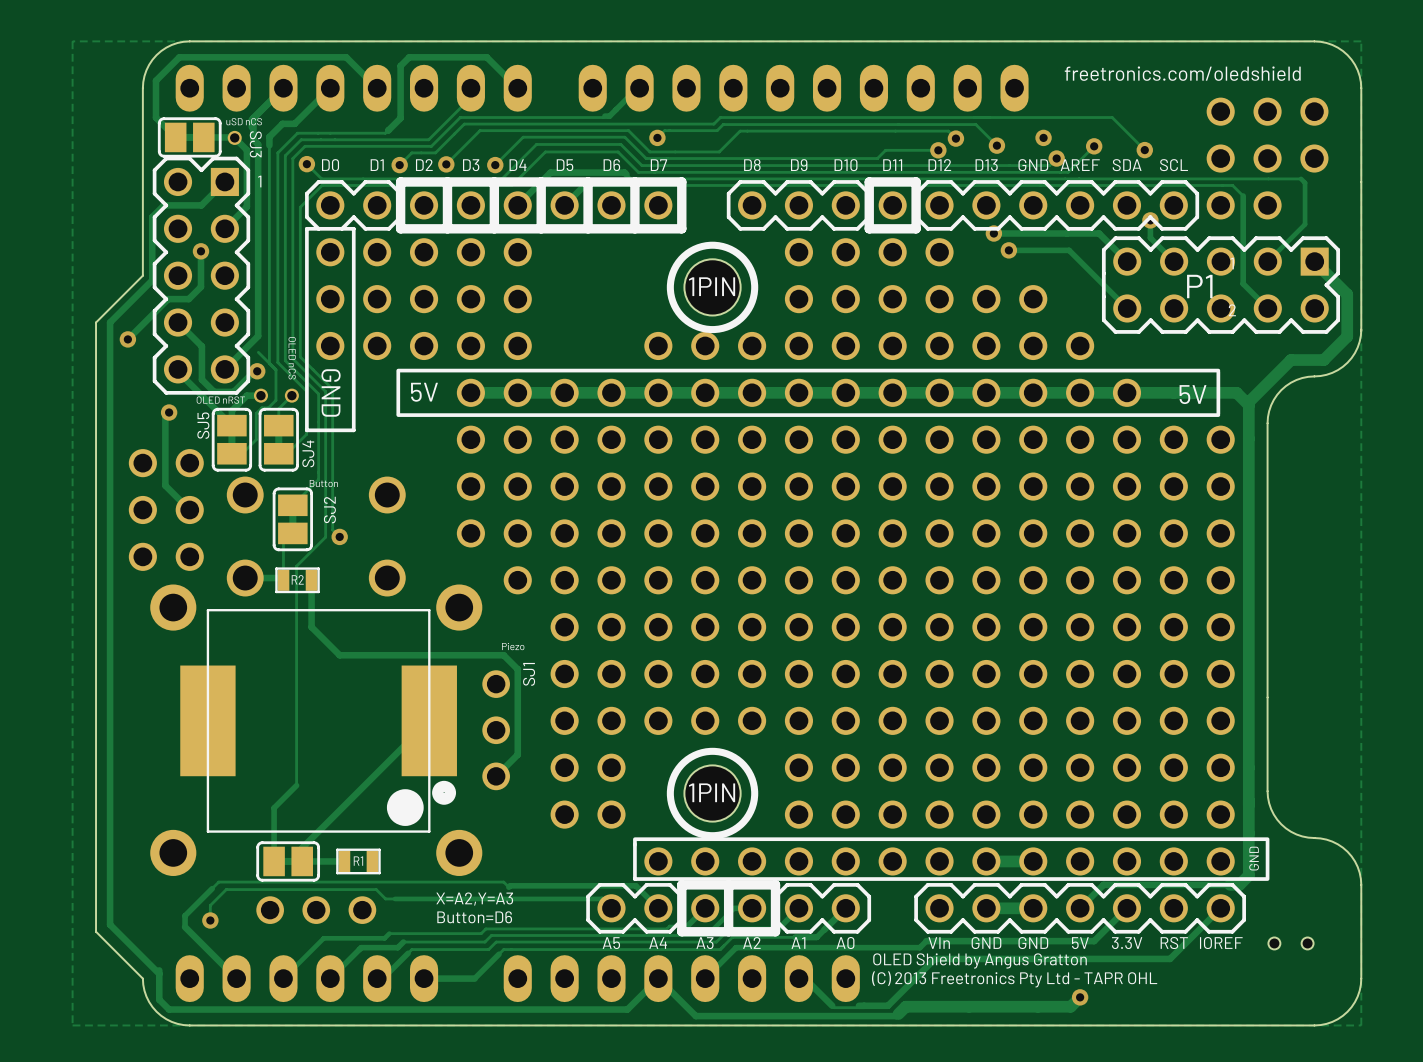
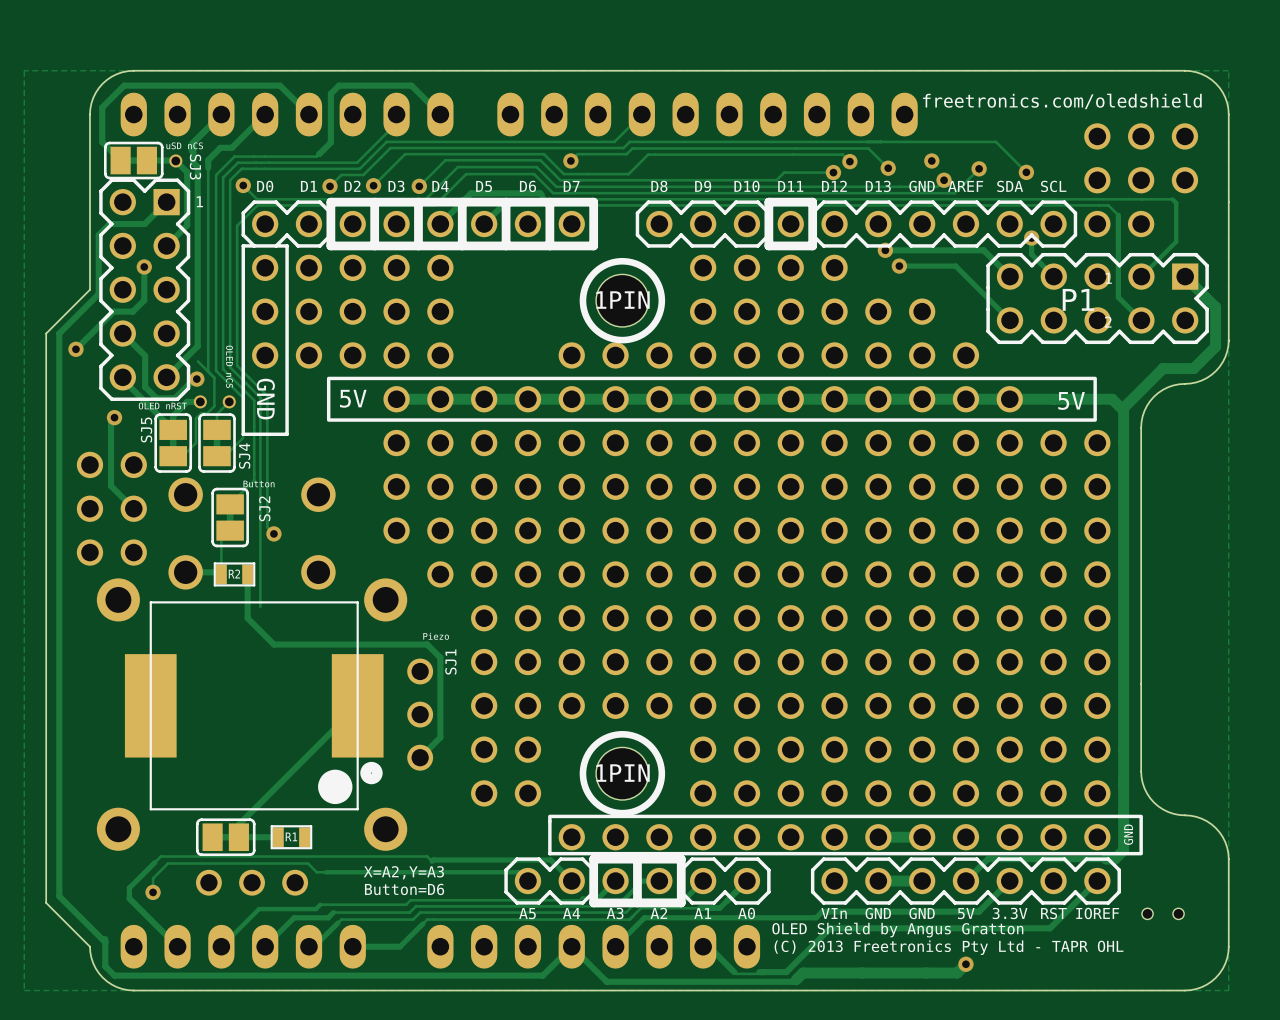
track: (639, 88) (609, 116) (603, 117) -> (641, 114) (614, 141) (520, 141)
track: (325, 391) (325, 537) (296, 566) (296, 785) (274, 808) (274, 861) -> (260, 397) (260, 606)

